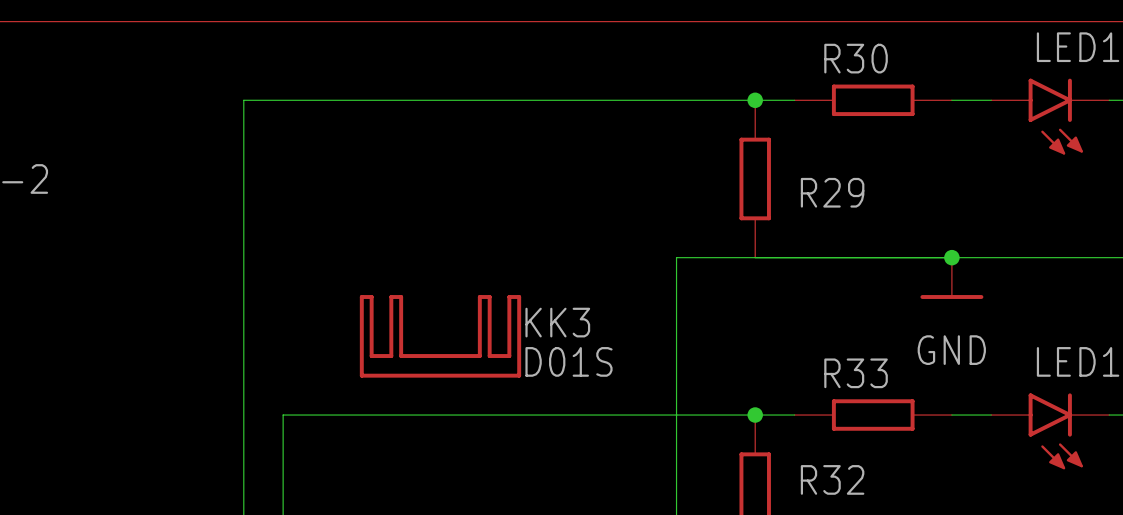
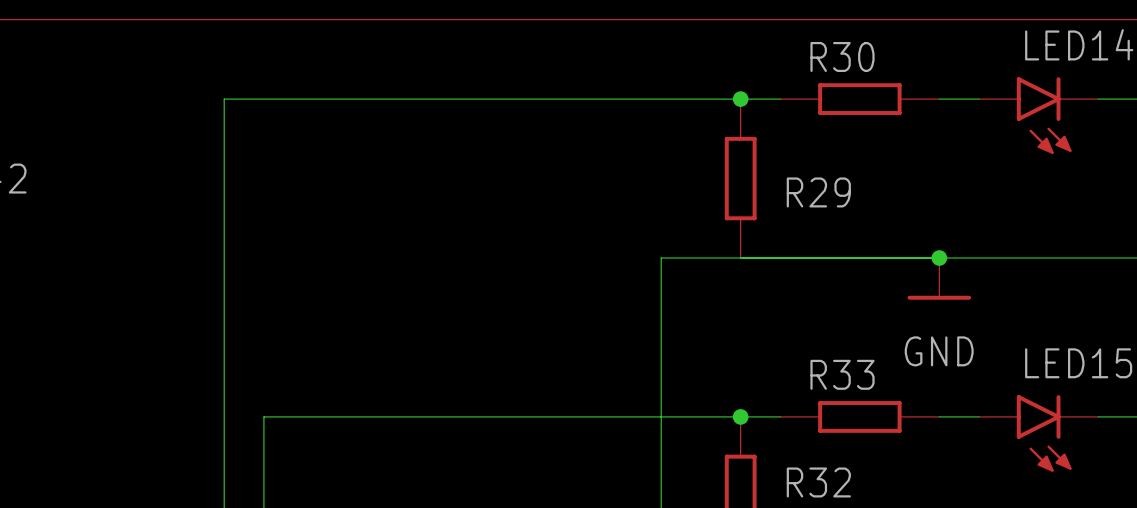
KK3: D01S (440, 336) -> none

